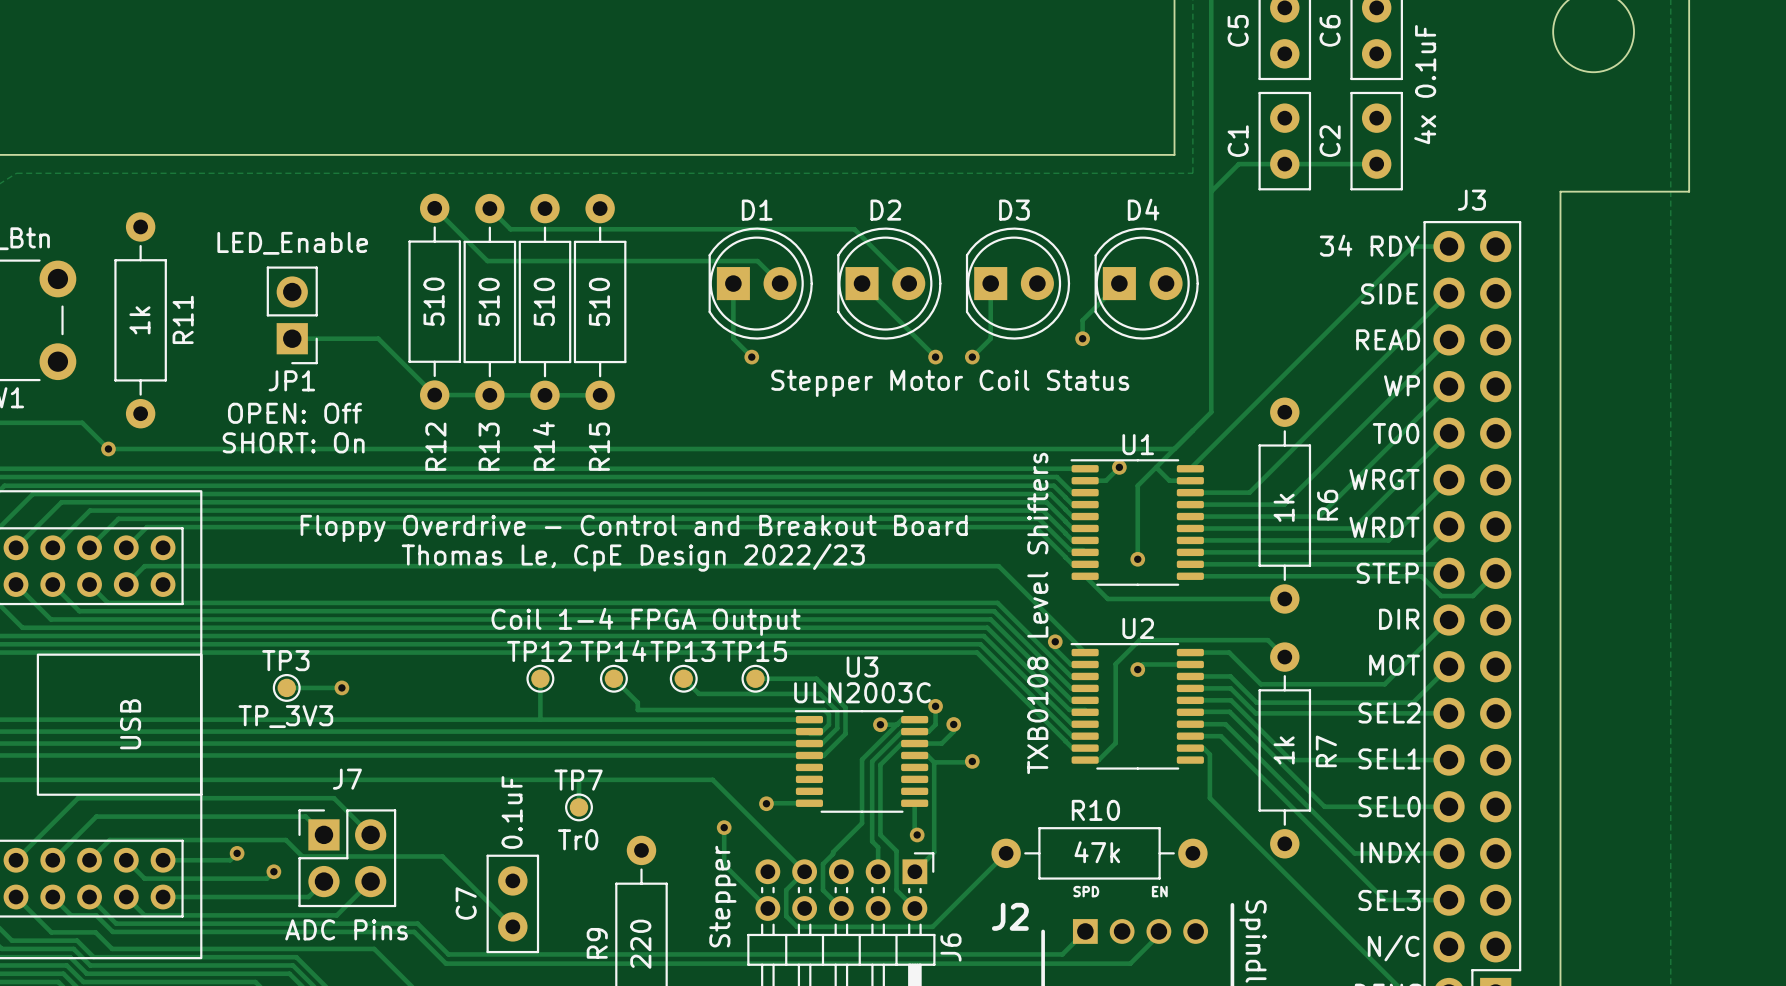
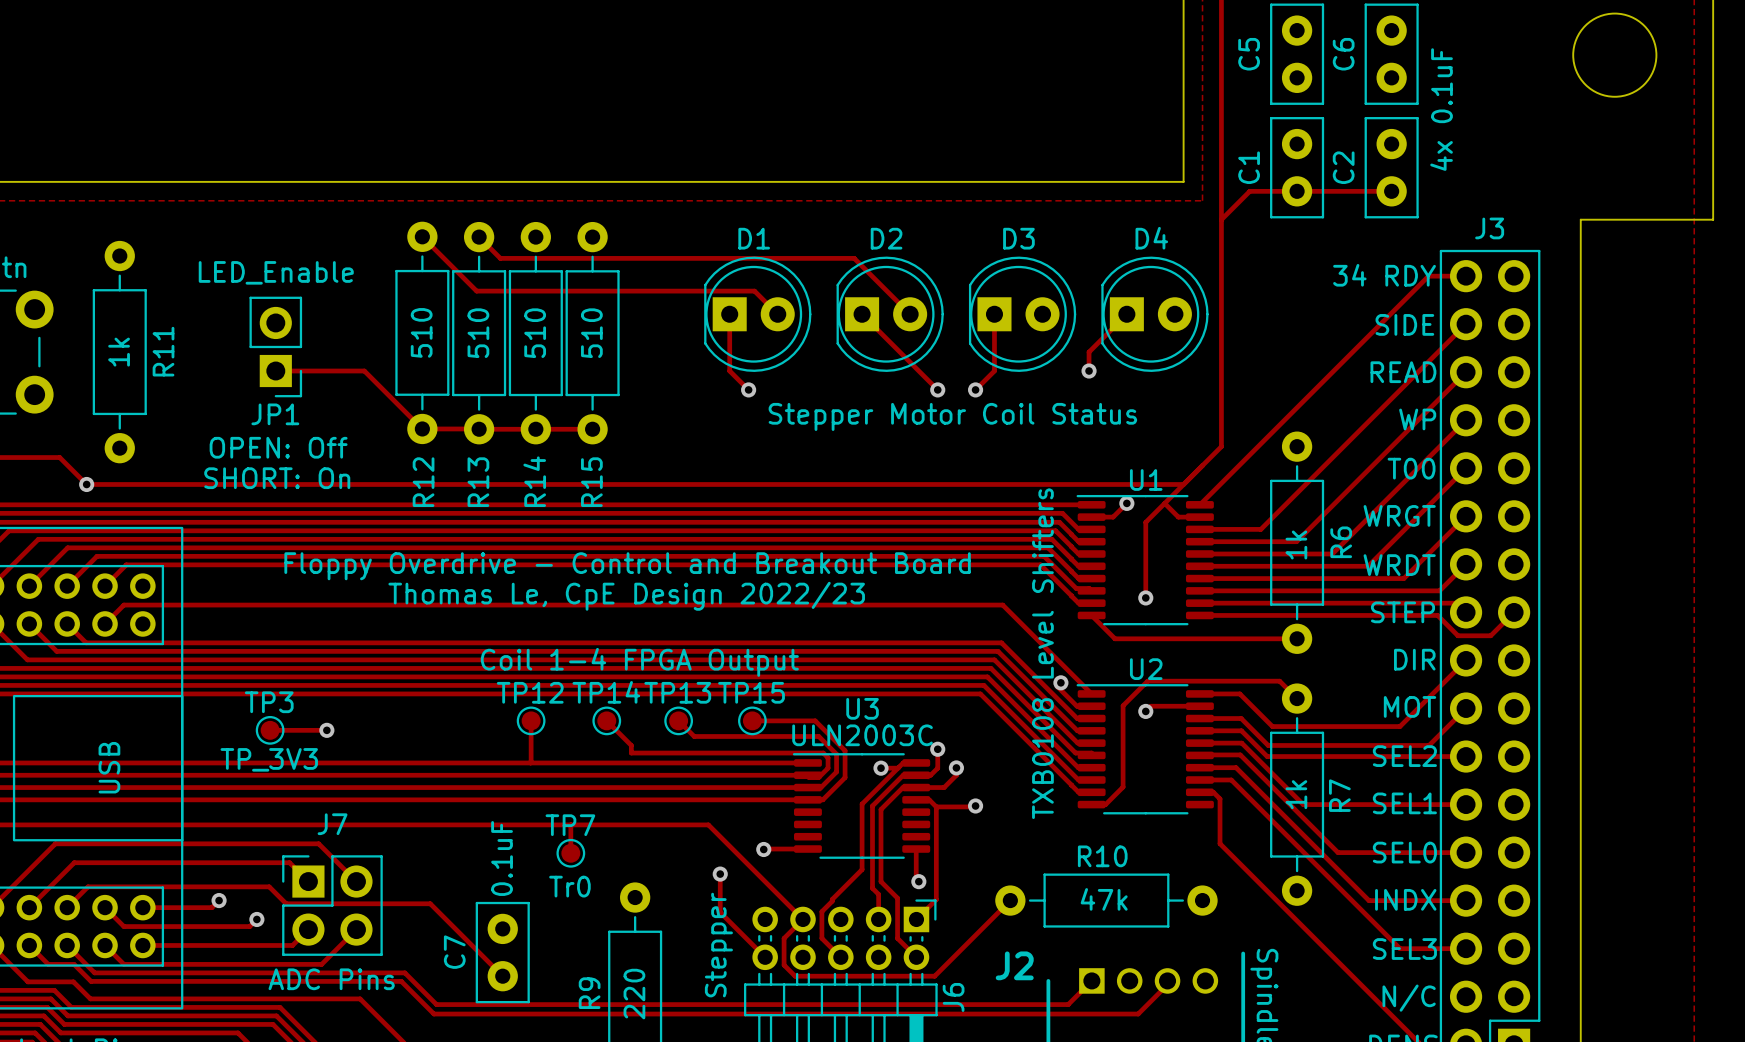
text: SPD (1086, 891) -> none
text: EN (1159, 891) -> none

